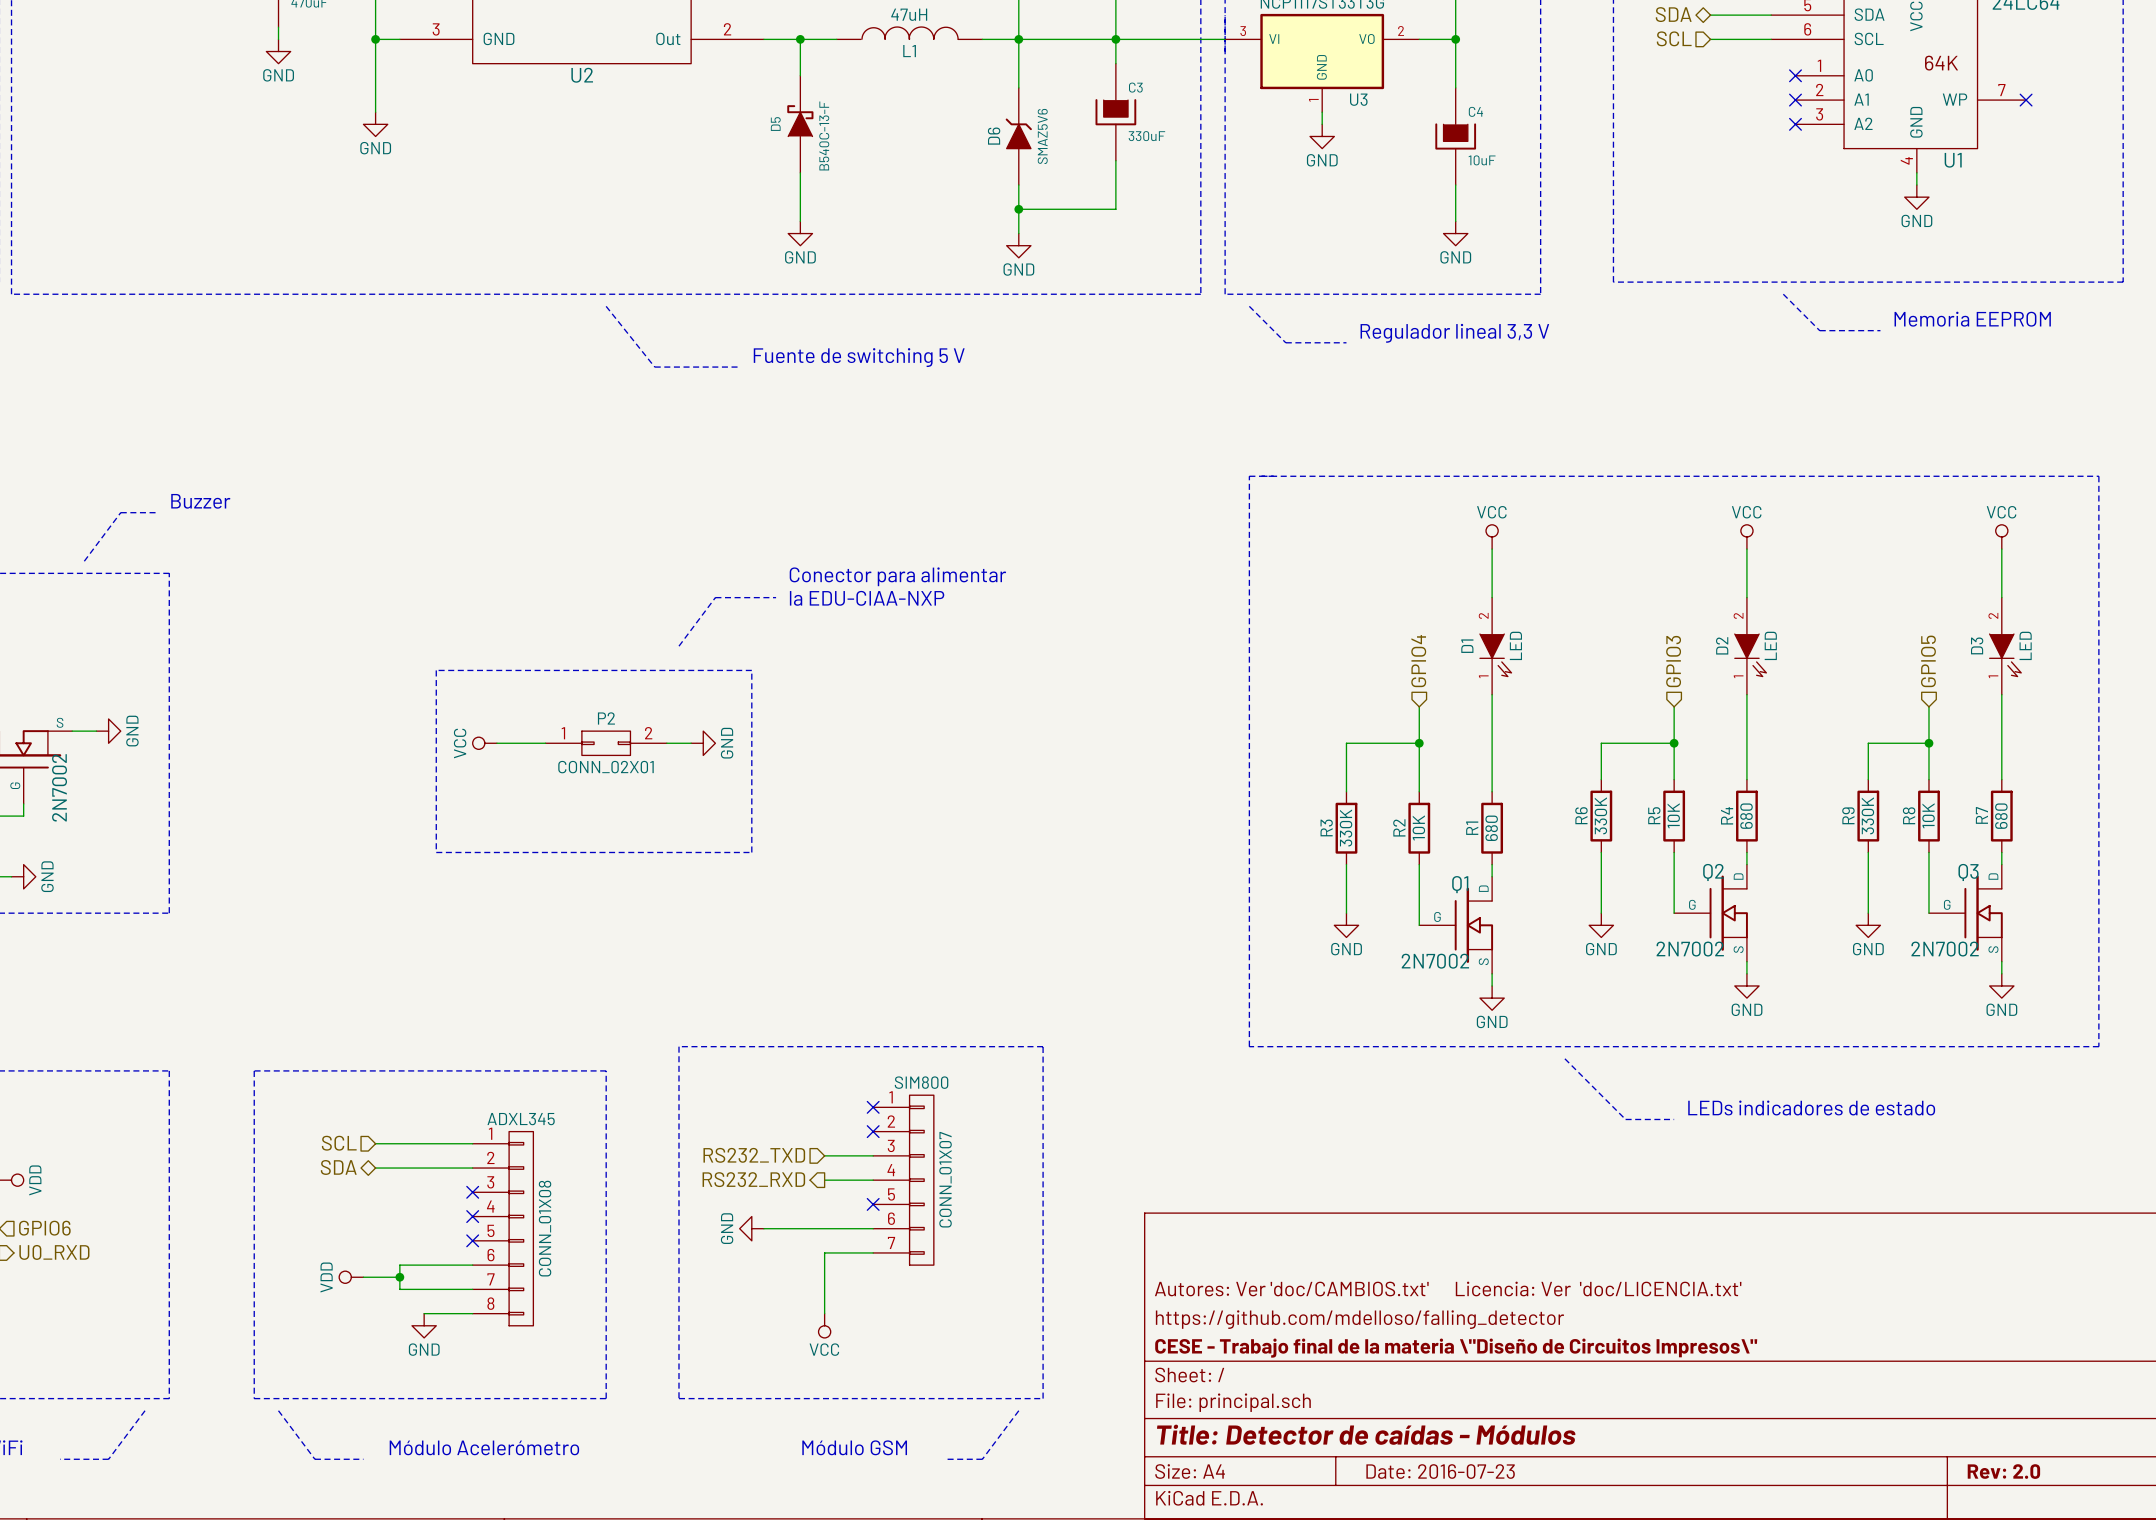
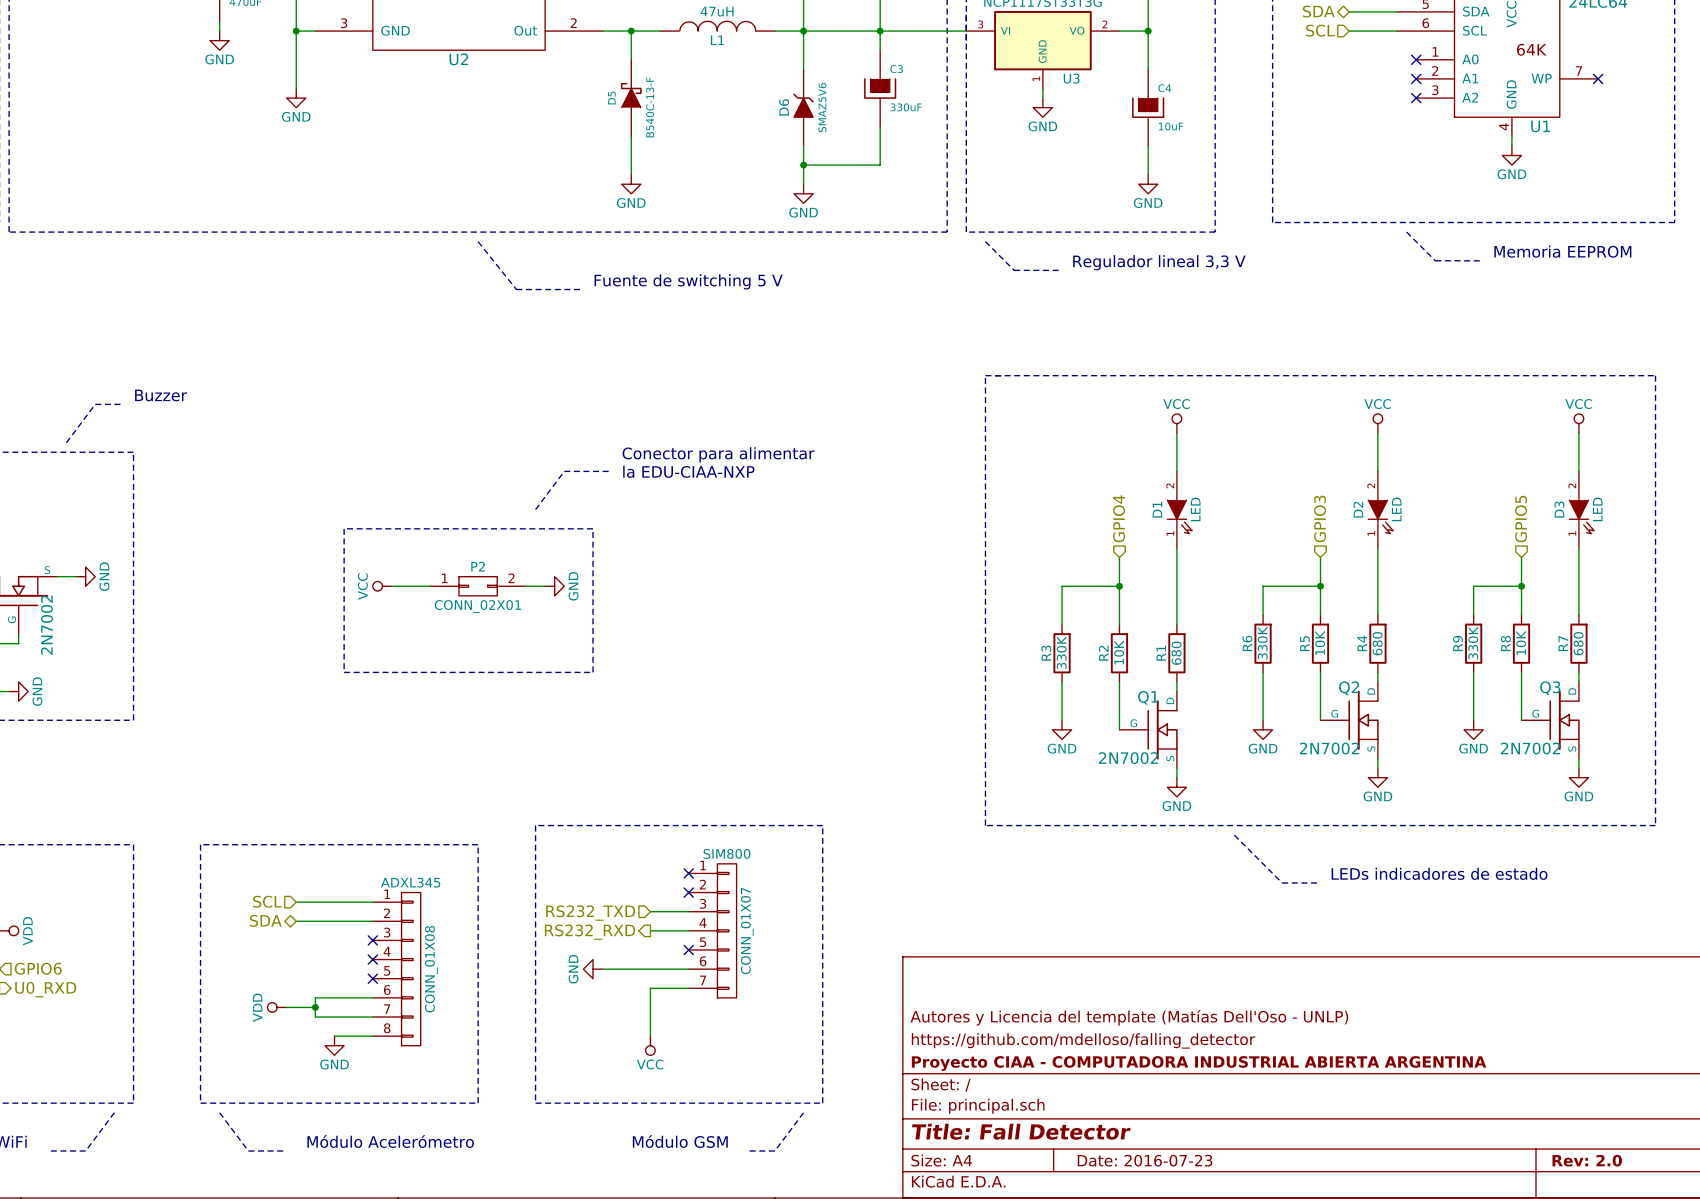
title block: Autores: Ver 'doc/CAMBIOS.txt' Licencia: Ver 'doc/LICENCIA.txt' (1448, 1289) -> Autores y Licencia del template (Matías Dell'Oso - UNLP) (1129, 1017)
title block: CESE - Trabajo final de la materia \"Diseño de Circuitos Impresos\" (1456, 1348) -> Proyecto CIAA - COMPUTADORA INDUSTRIAL ABIERTA ARGENTINA (1199, 1063)
title block: Title: Detector de caídas - Módulos (1366, 1434) -> Title: Fall Detector (1021, 1131)

